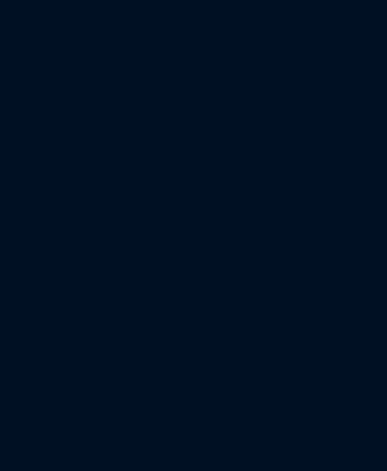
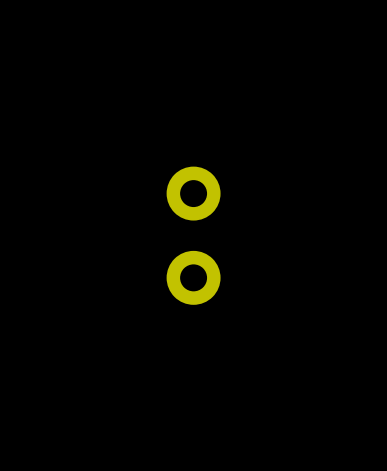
part: none -> (193, 235)

